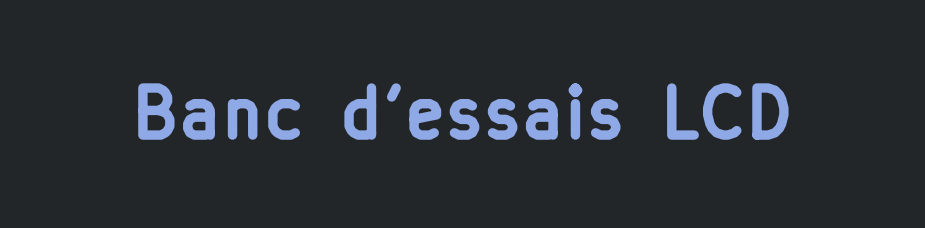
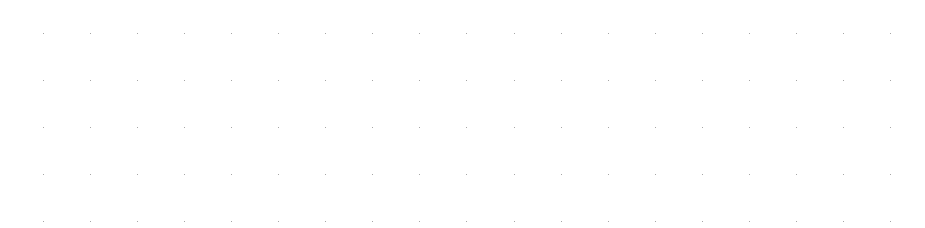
text: Banc d'essais LCD (463, 111) -> none

